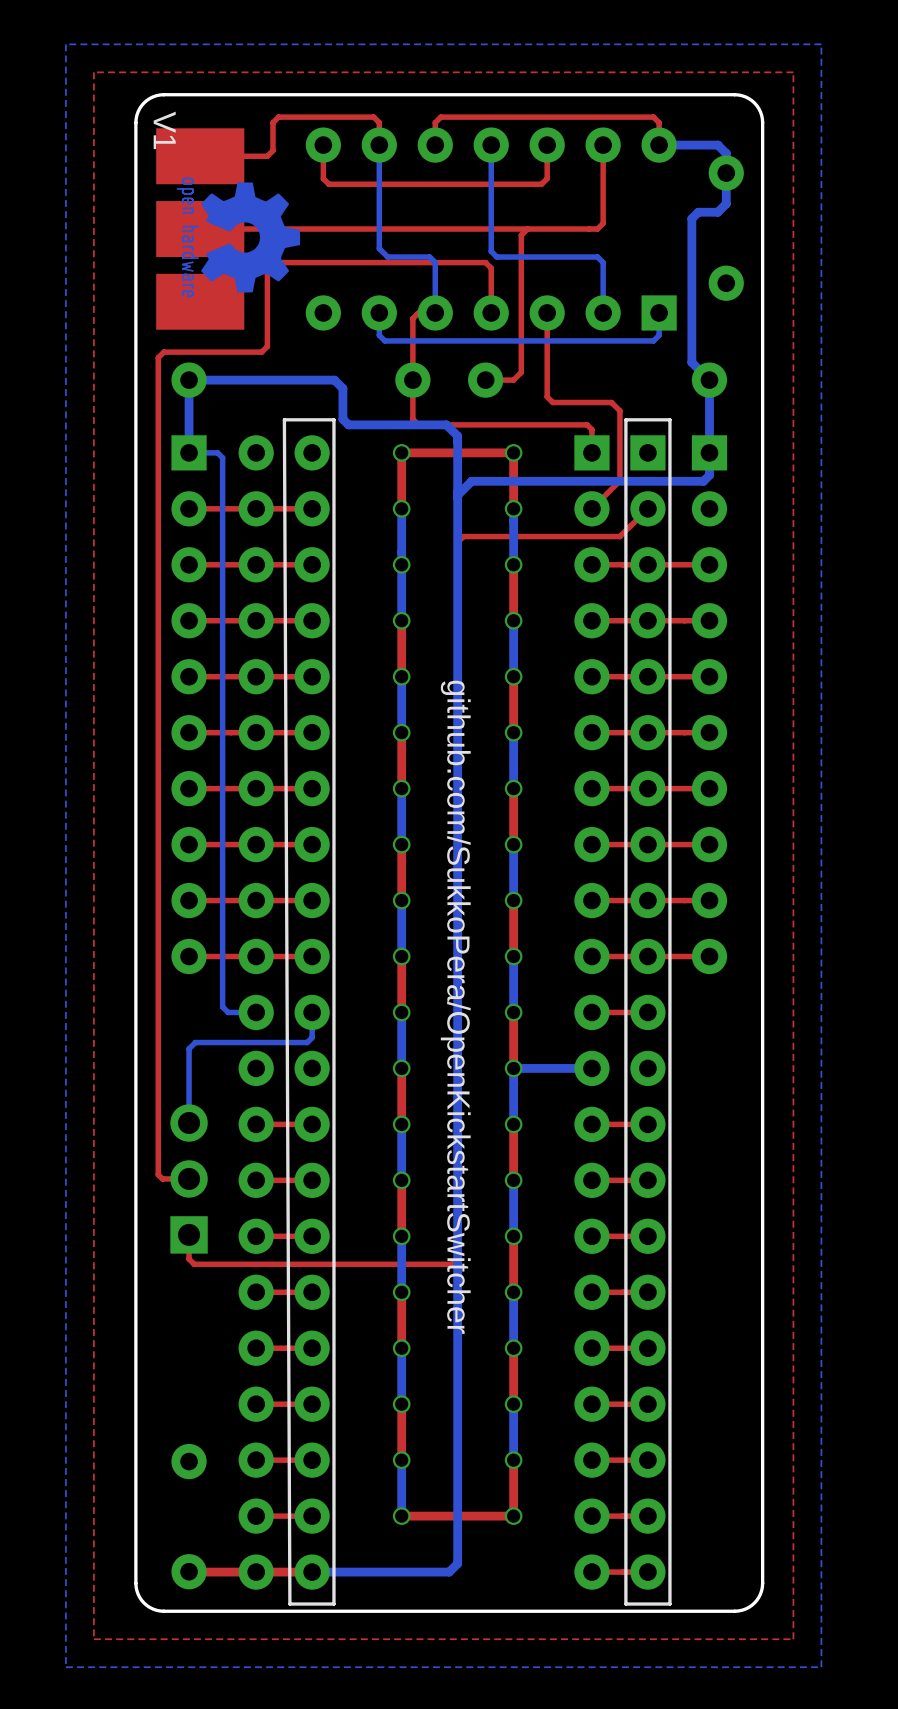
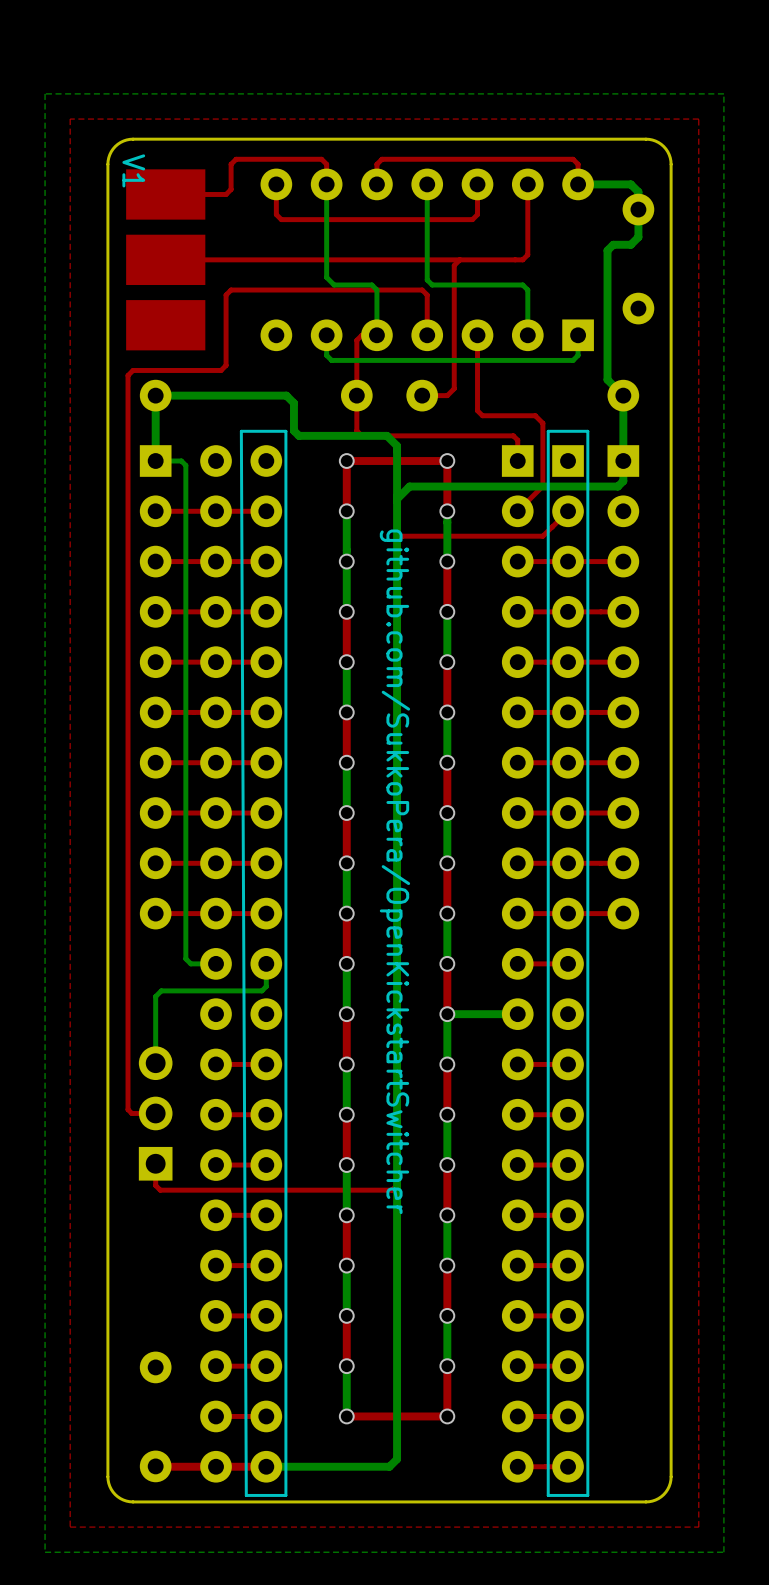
drawing: [176, 177, 301, 298] -> none
text position: github.com/SukkoPera/OpenKickstartSwitcher (455, 1007) -> github.com/SukkoPera/OpenKickstartSwitcher (394, 871)

